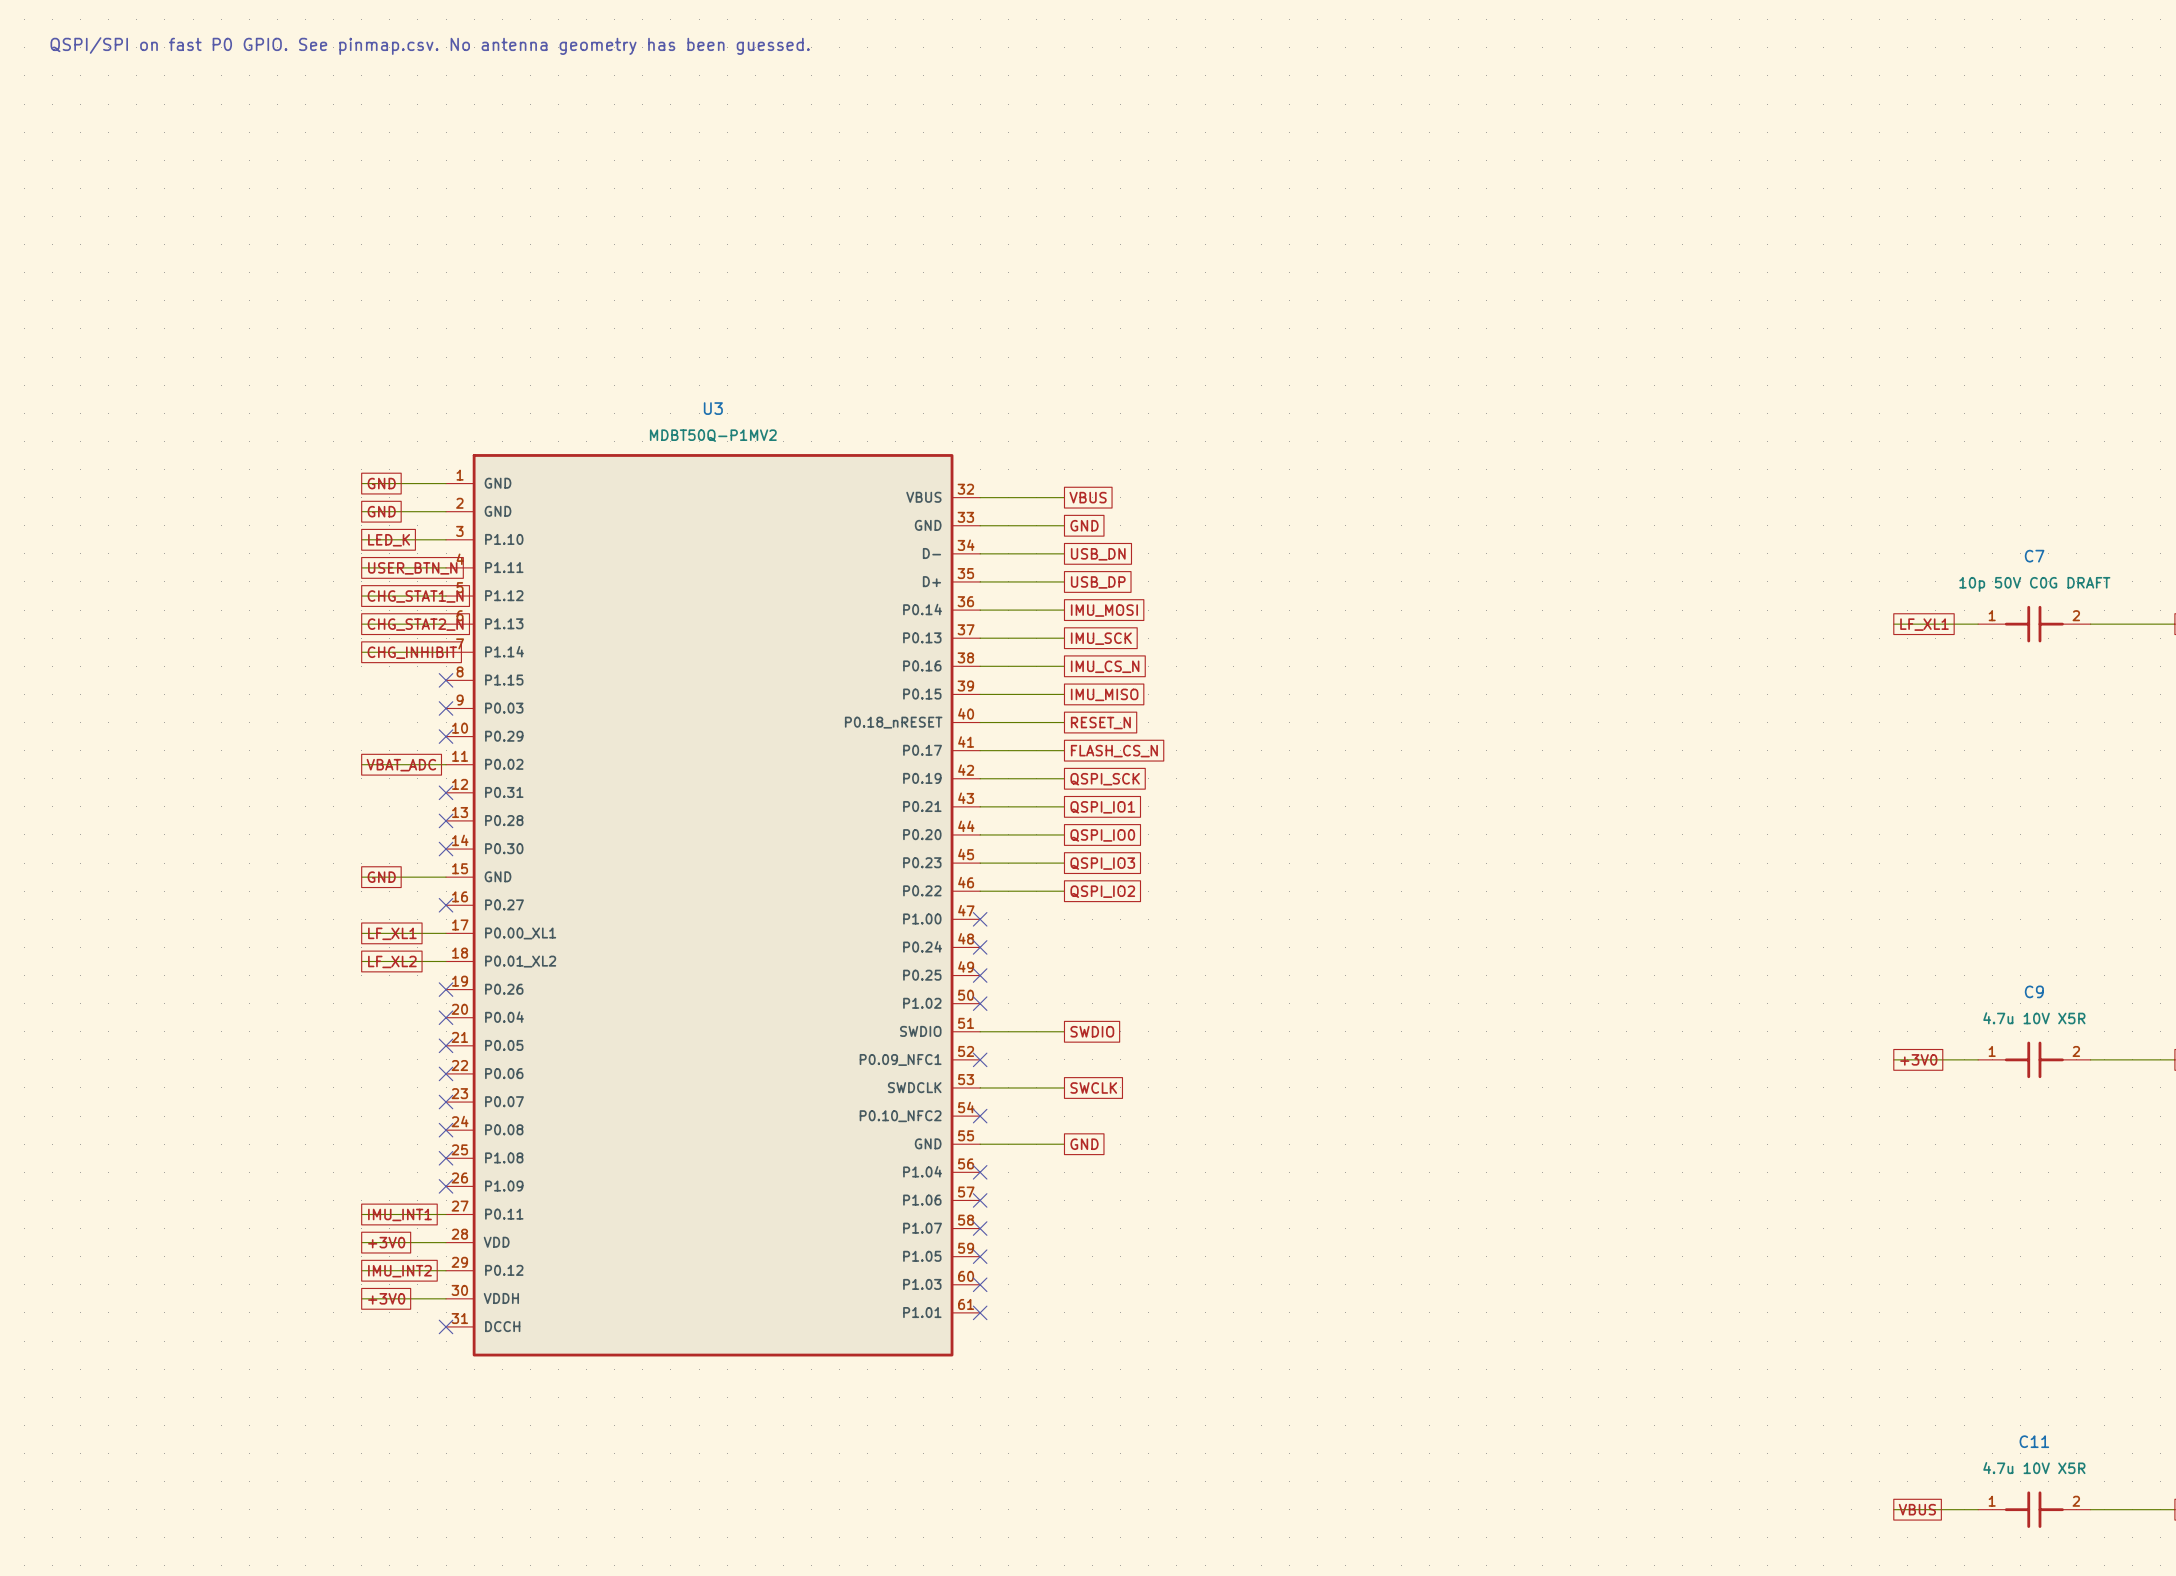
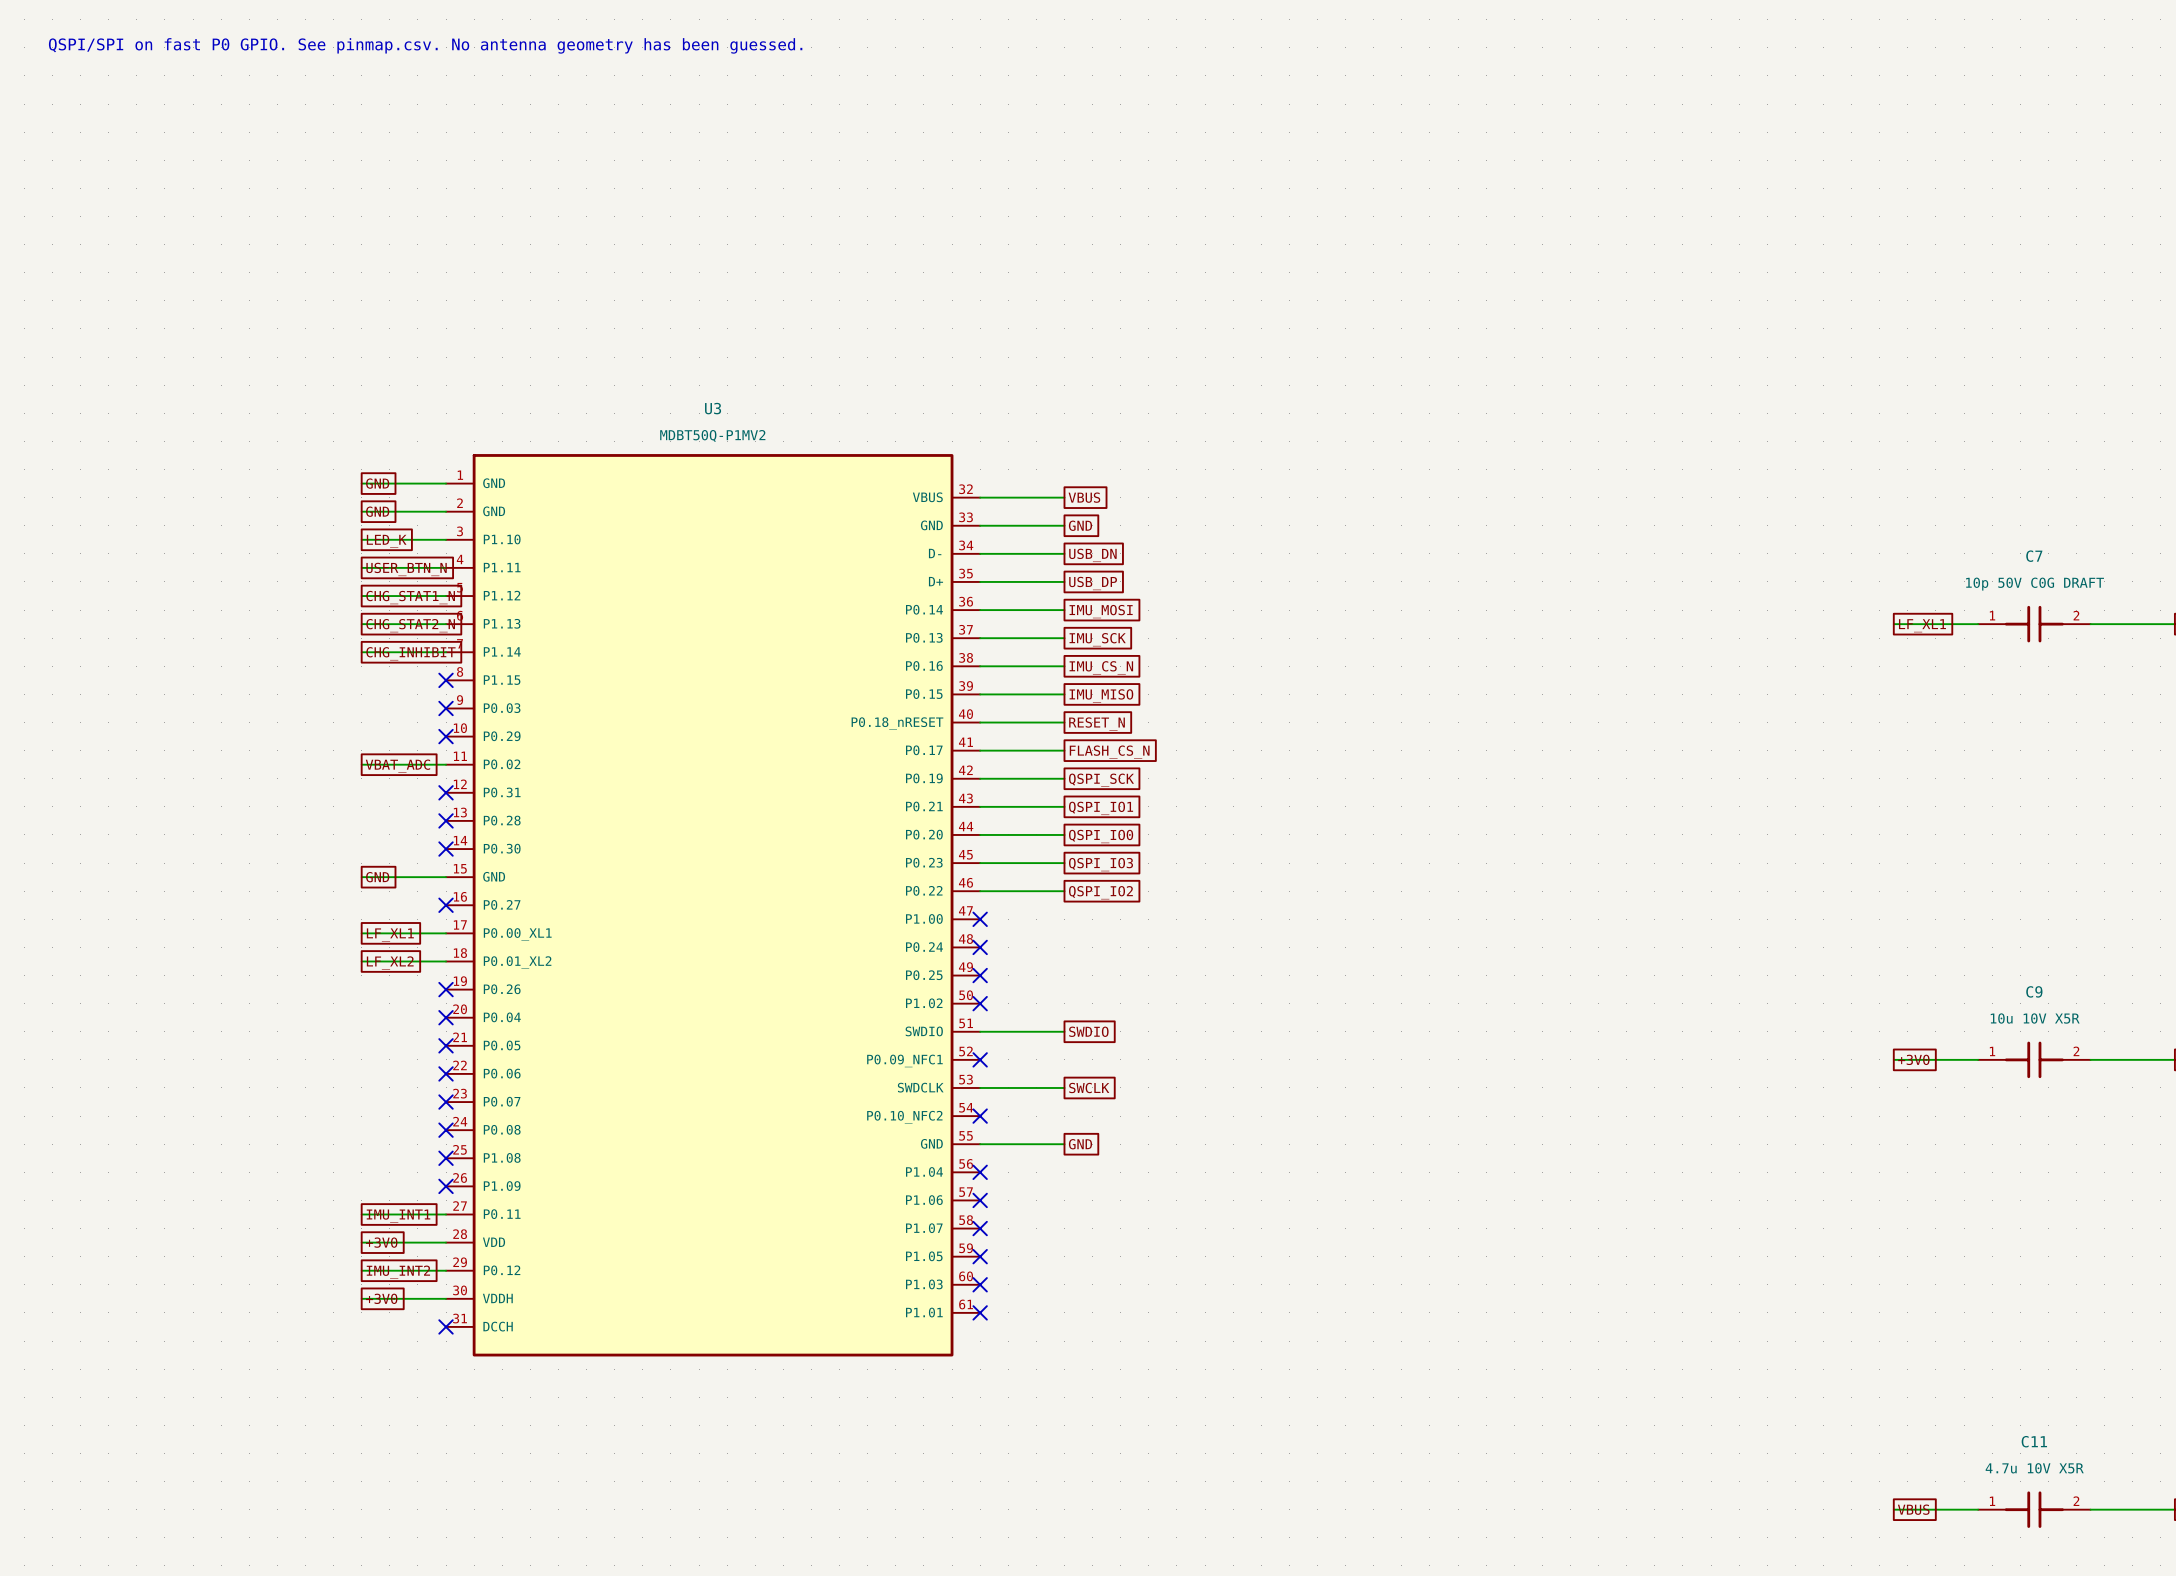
C9 value: 4.7u 10V X5R (2034, 1018) -> 10u 10V X5R (2035, 1018)

